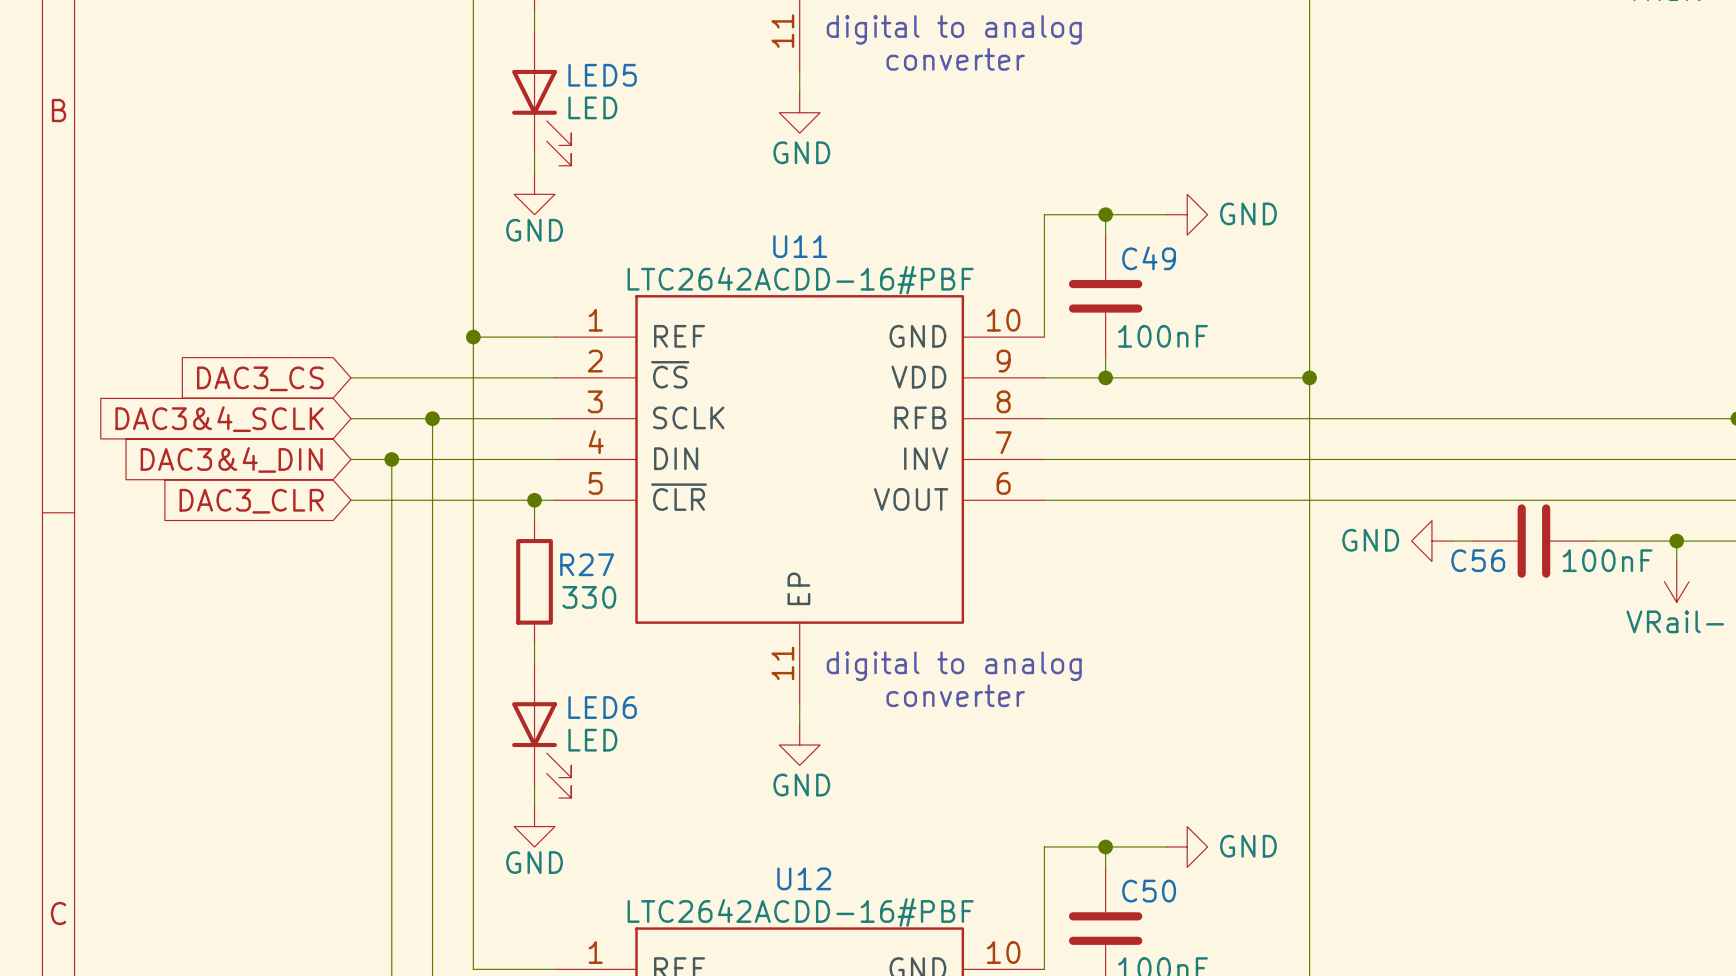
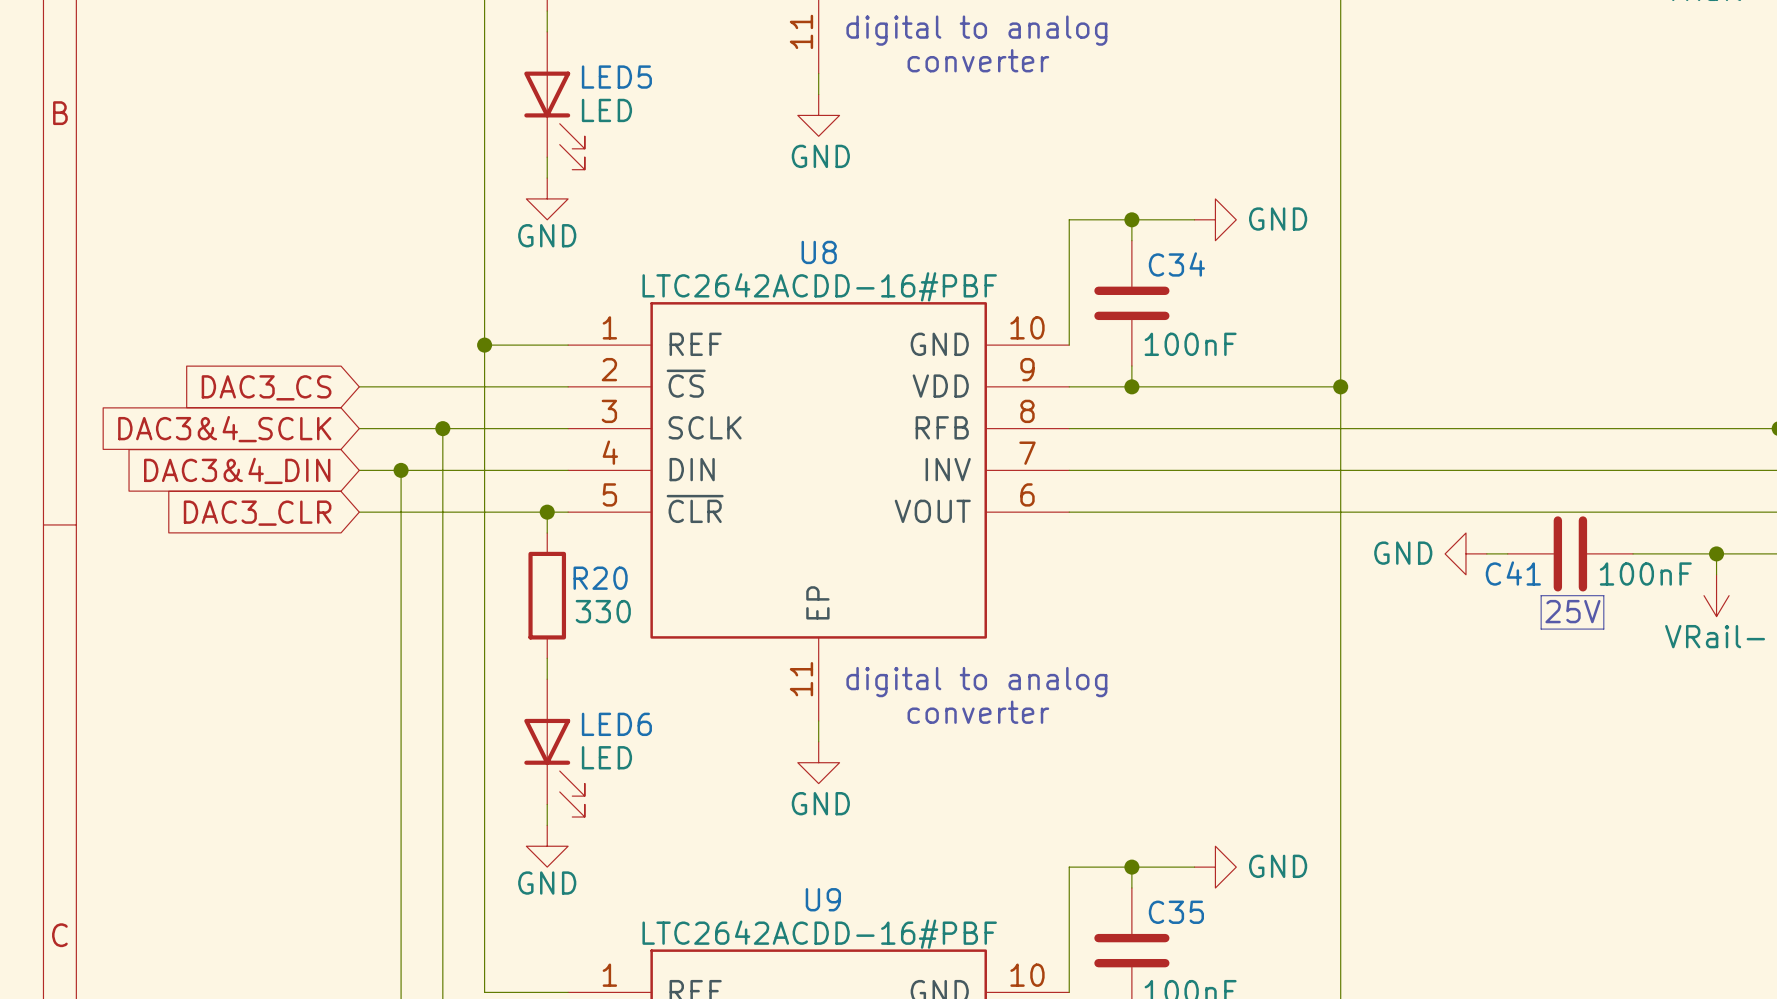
U11 name: U11 (800, 246) -> U8 (819, 252)
C49 name: C49 (1149, 258) -> C34 (1176, 264)
C56 name: C56 (1478, 560) -> C41 (1513, 573)
R27 name: R27 (587, 564) -> R20 (600, 578)
line: none -> (1541, 595) (1603, 595) (1603, 629) (1541, 629) (1541, 595)
text: none -> 25V (1572, 611)
U12 name: U12 (804, 878) -> U9 (823, 899)
C50 name: C50 (1149, 891) -> C35 (1176, 912)

